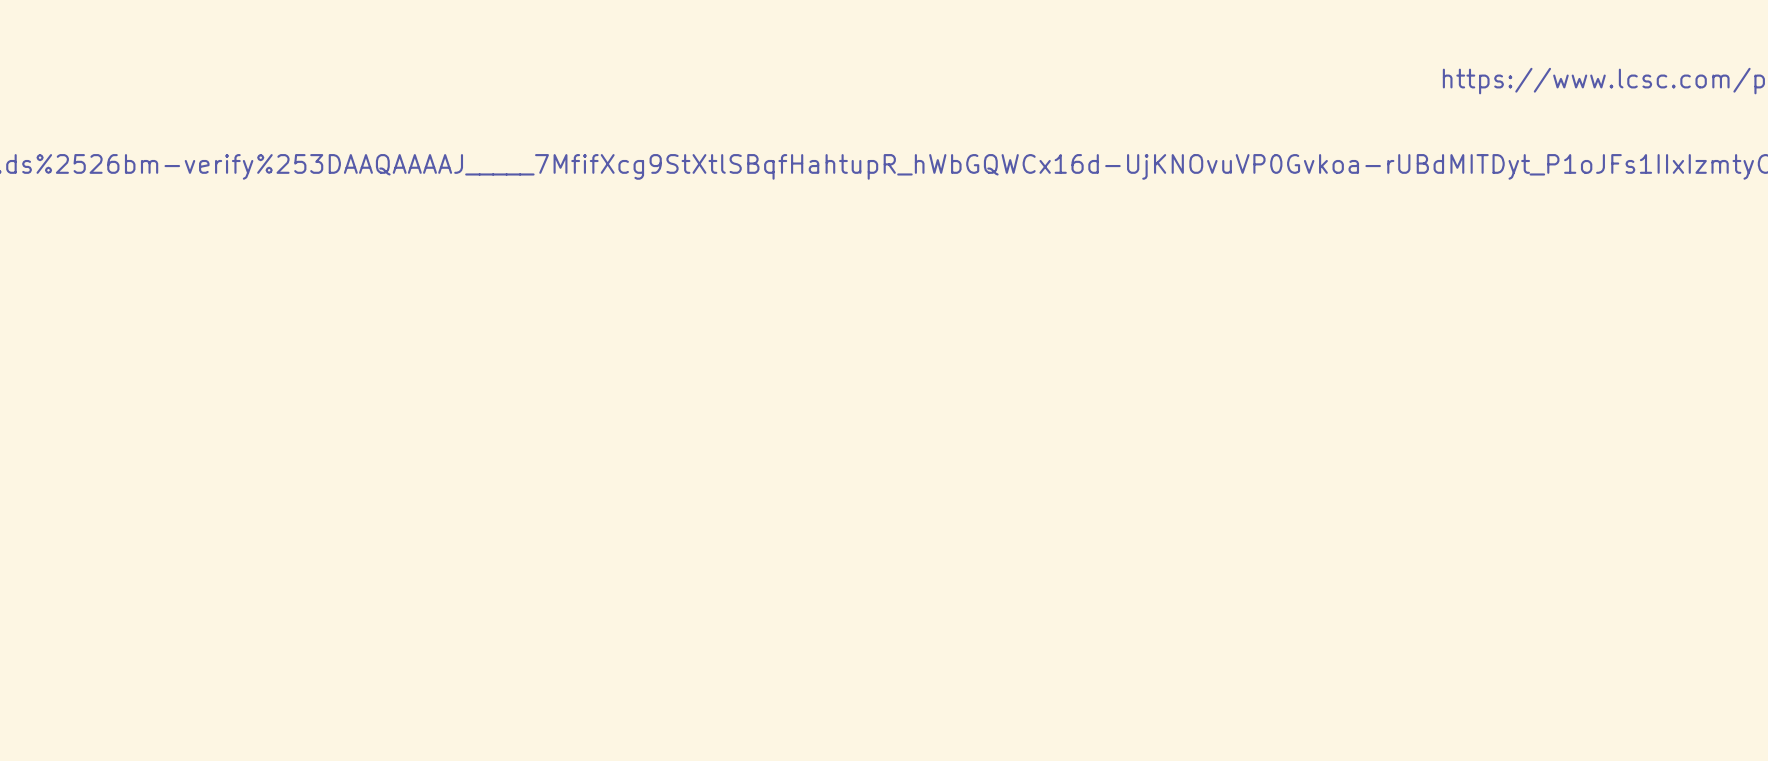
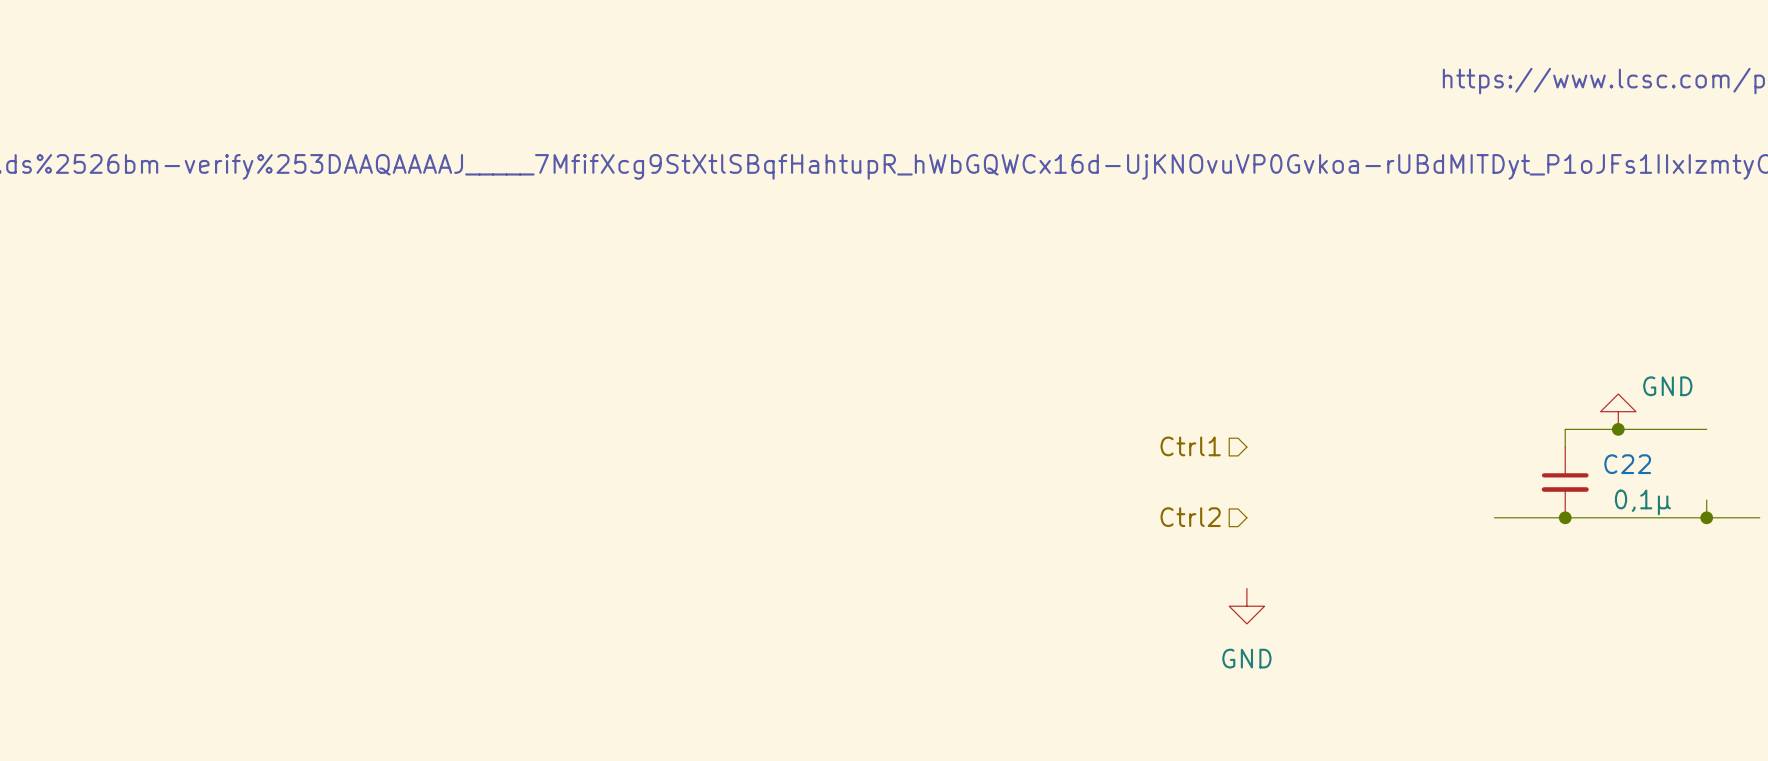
power symbol: none -> GND (1618, 411)
junction: none -> (1618, 429)
wire: none -> (1706, 429) (1565, 429) (1565, 447)
hierarchical label: none -> Ctrl1 (1190, 446)
C22: none -> 0,1µ (1565, 482)
wire: none -> (1706, 500) (1706, 517)
hierarchical label: none -> Ctrl2 (1190, 517)
wire: none -> (1494, 517) (1759, 517)
junction: none -> (1565, 517)
junction: none -> (1706, 517)
power symbol: none -> GND (1246, 606)

